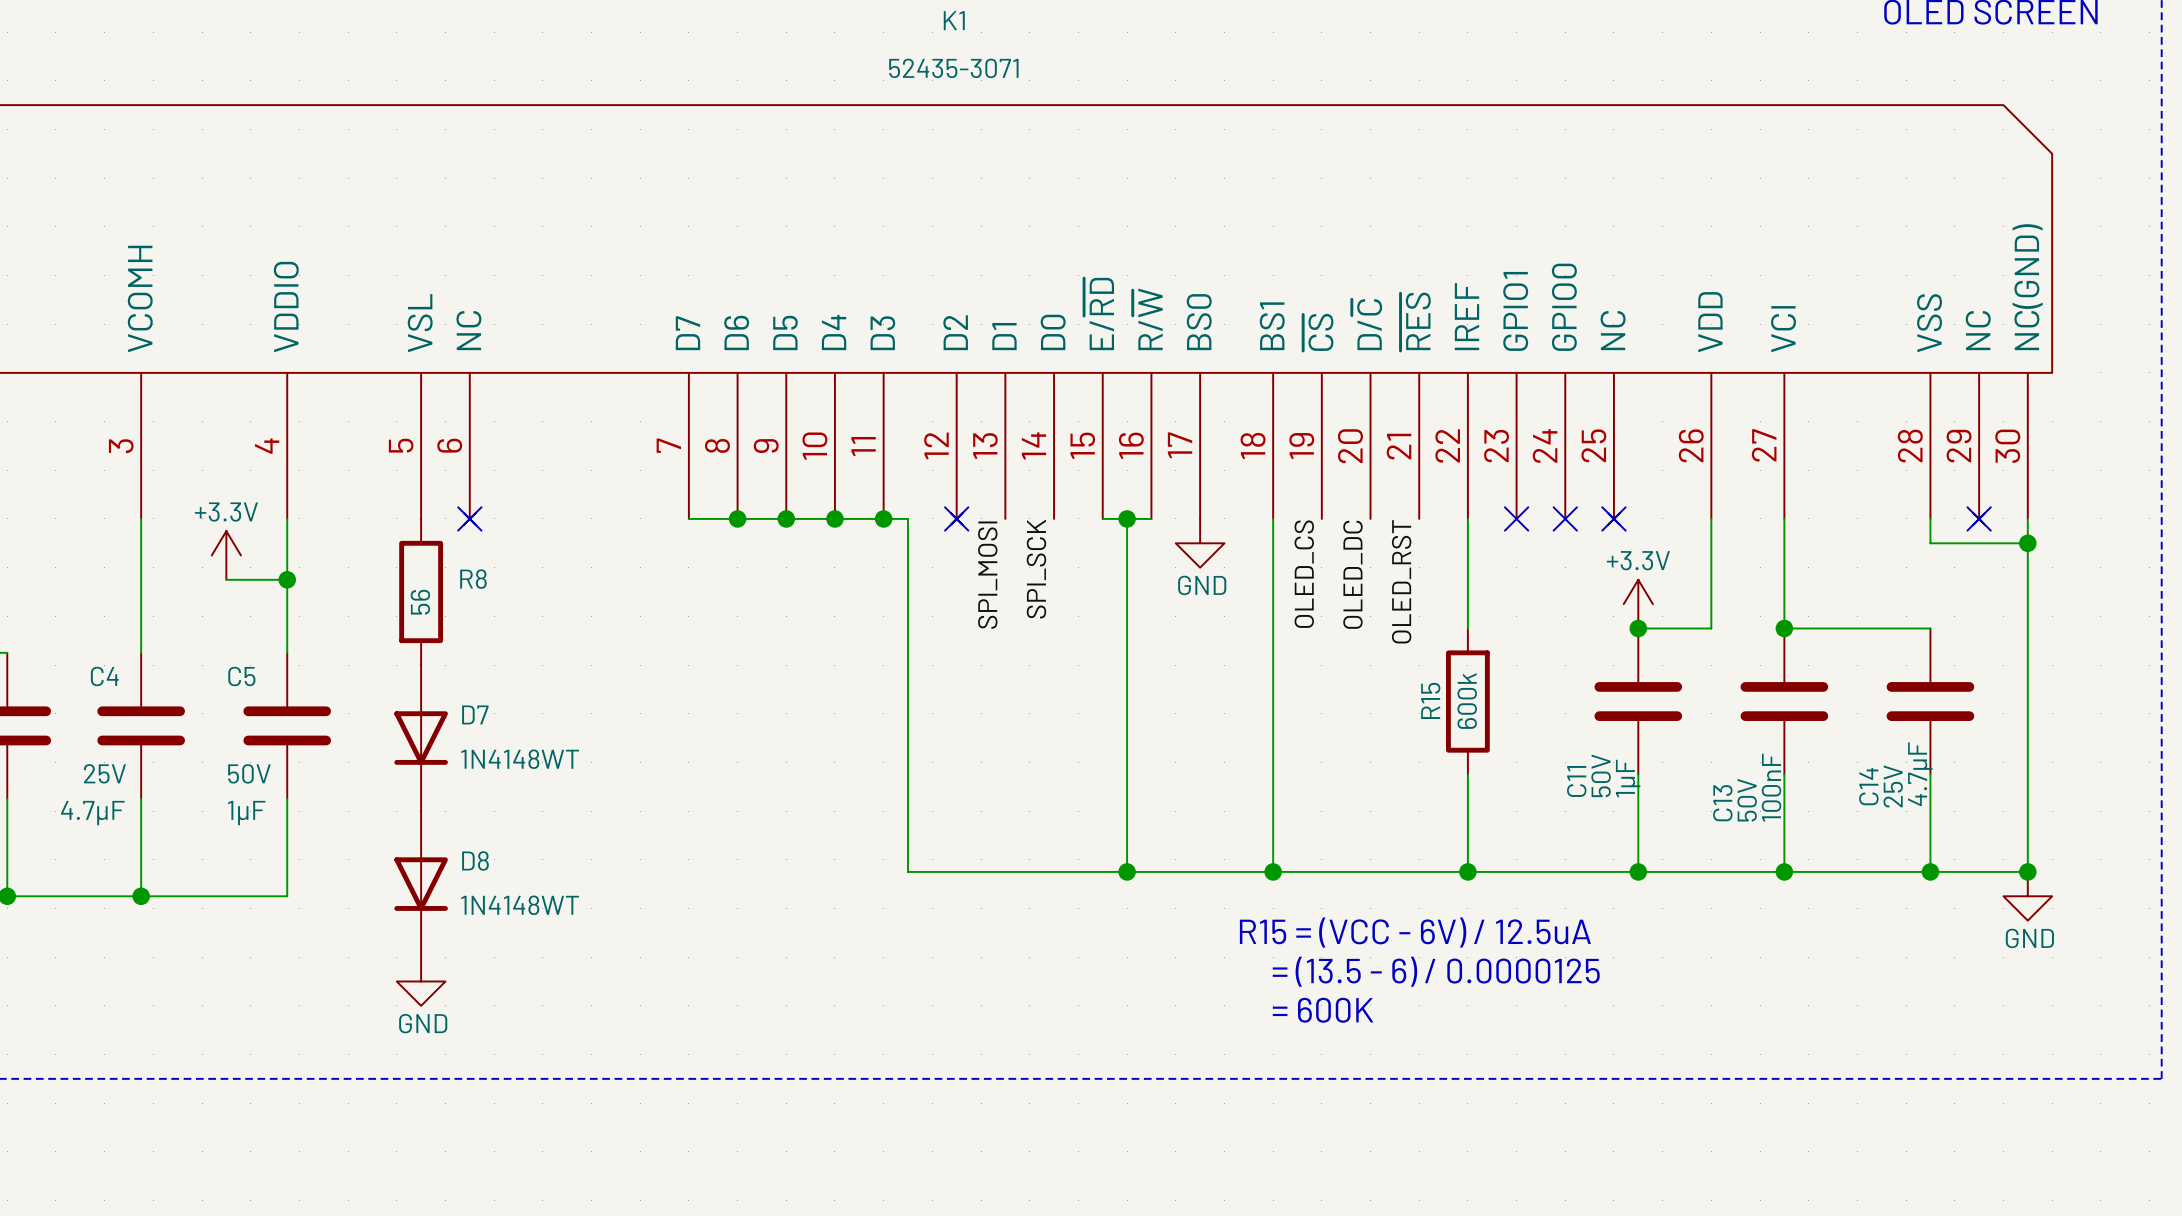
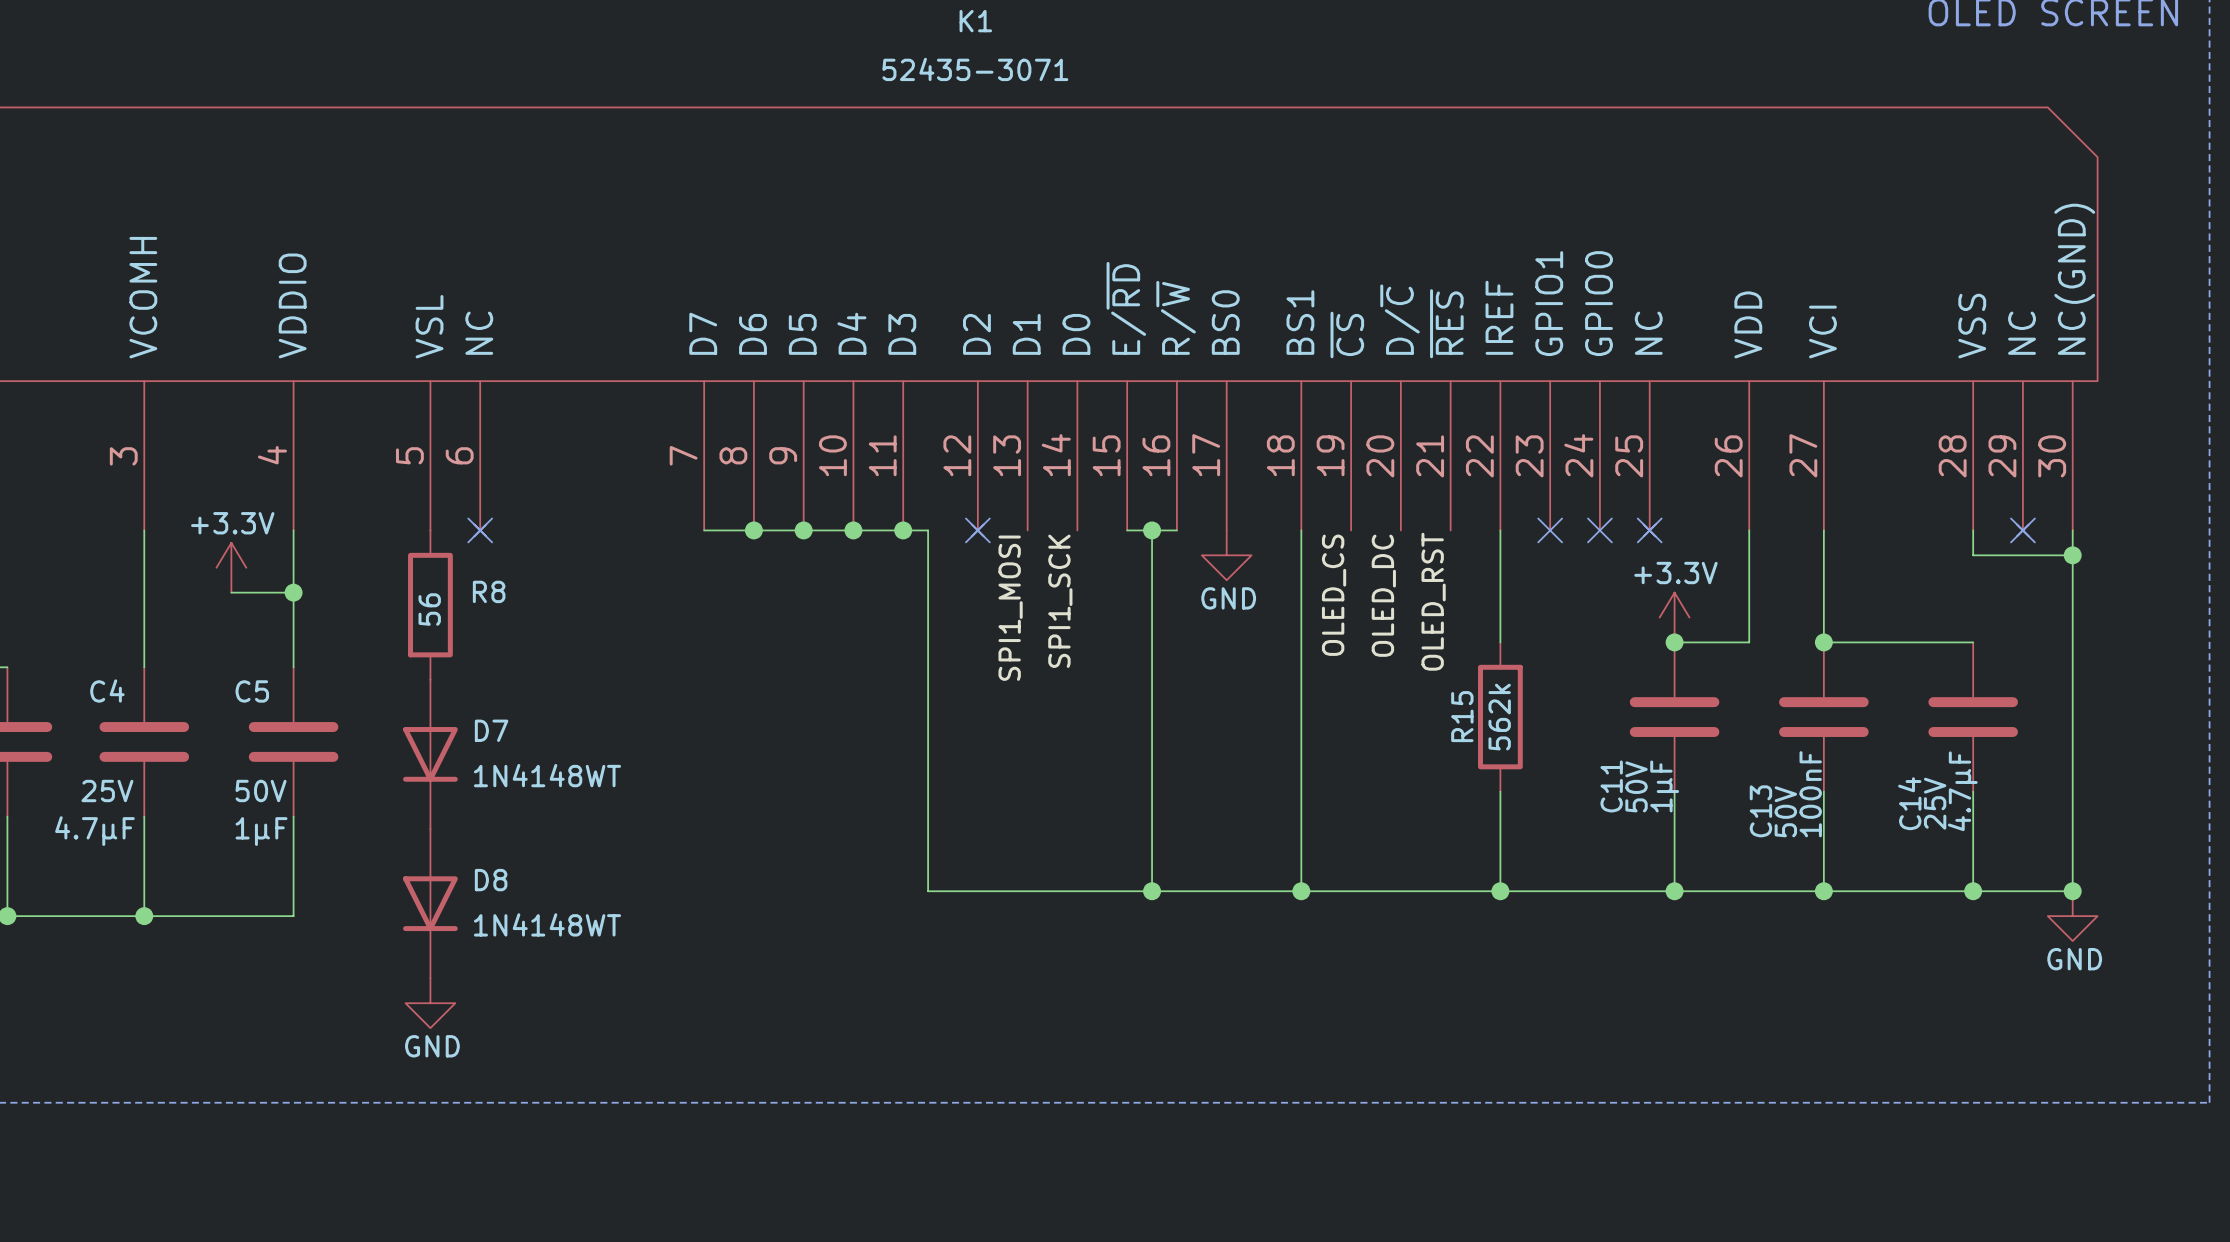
label: SPI_SCK (1036, 569) -> SPI1_SCK (1060, 601)
label: SPI_MOSI (987, 575) -> SPI1_MOSI (1010, 608)
R15 text: 600k (1467, 701) -> 562k (1499, 717)
text: R15 = (VCC - 6V) / 12.5uA (1415, 932) -> none
text: = (13.5 - 6) / 0.0000125 (1436, 971) -> none
text: = 600K (1323, 1010) -> none

